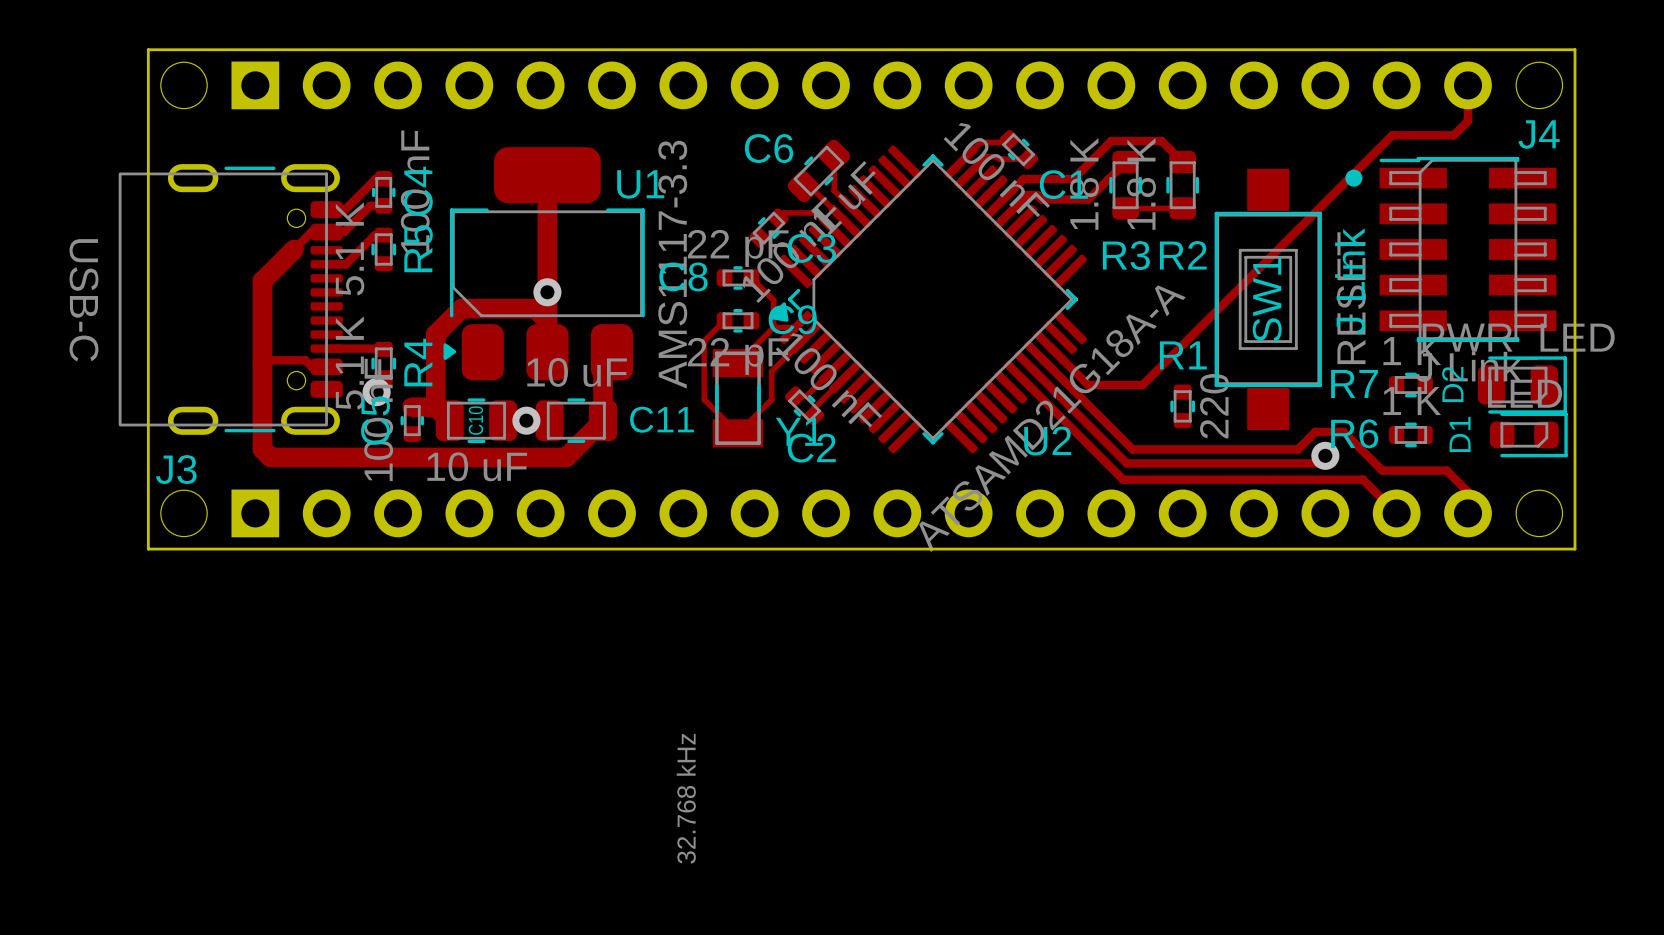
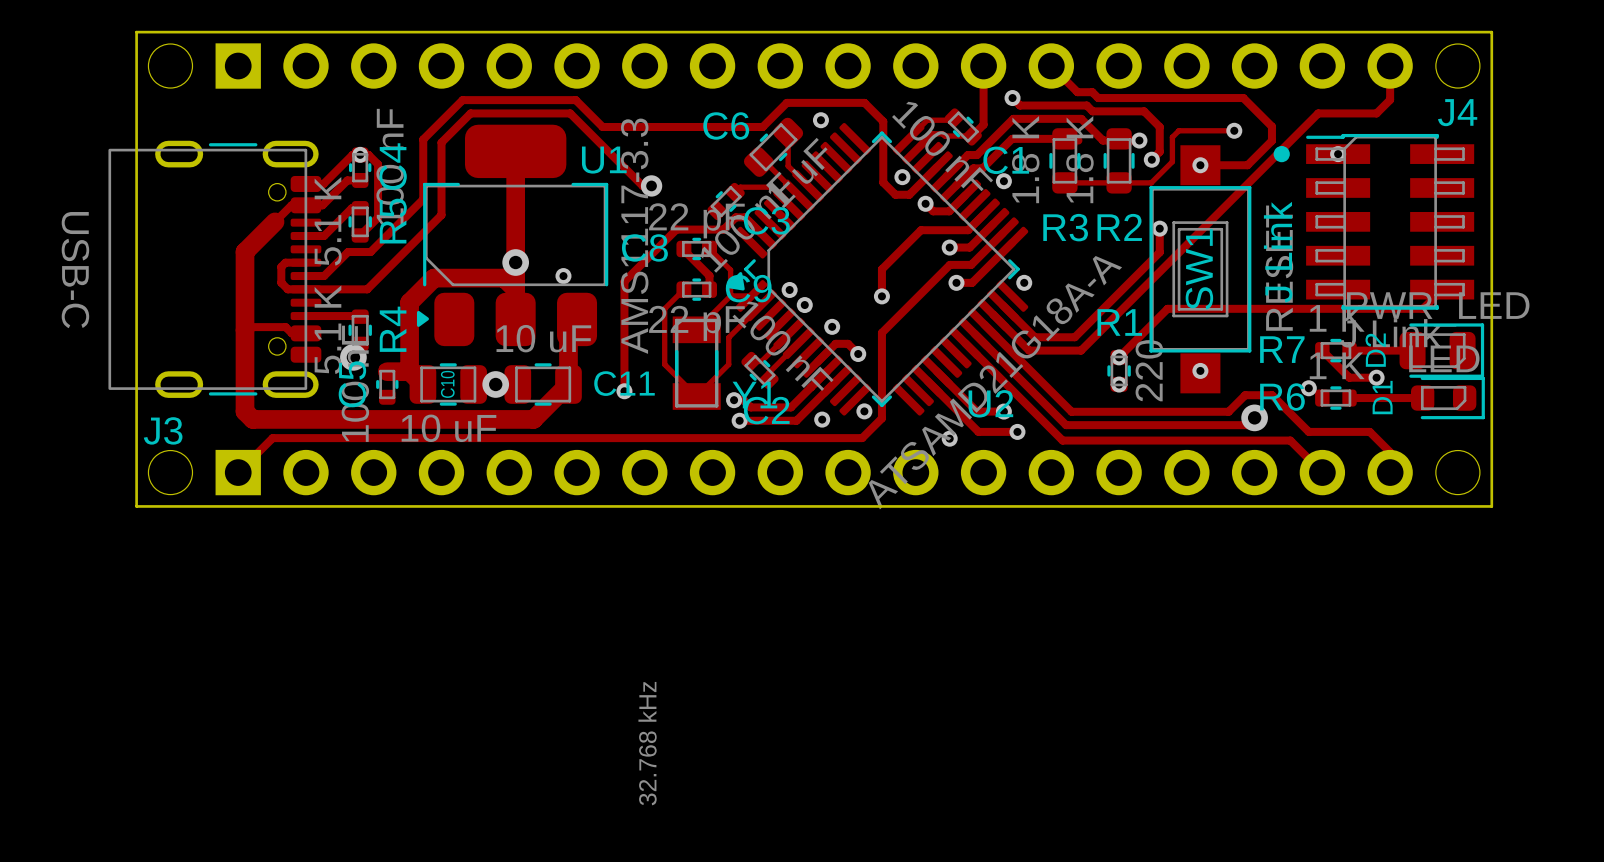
track: none -> (983, 66) (983, 124) (972, 136)
track: none -> (1051, 66) (1077, 92) (1092, 92) (1098, 98) (1243, 98) (1271, 126) (1271, 140) (1247, 165) (1200, 165)
track: none -> (1012, 98) (1020, 105) (1086, 105) (1092, 111) (1144, 111) (1159, 127) (1159, 151) (1151, 159)
via: none -> (1012, 98)
track: (1111, 141) (1073, 179) (1033, 179) -> (1051, 118) (1013, 118) (977, 155)
track: (1142, 141) (1161, 141) (1182, 162) -> (1081, 118) (1102, 140) (1139, 140)
via: none -> (820, 120)
track: none -> (1234, 130) (1178, 130) (1172, 137) (1172, 161) (1151, 182) (1119, 182)
via: none -> (1234, 130)
track: (1125, 162) (1088, 199) (1041, 199) (1037, 195) (1027, 195) -> (1078, 140) (1076, 138) (1012, 138) (982, 168) (971, 170)
via: none -> (1139, 140)
track: none -> (360, 154) (368, 154) (378, 164) (378, 217) (360, 235)
via: none -> (360, 154)
via: none -> (1338, 154)
via: none -> (1151, 159)
via: none -> (1200, 165)
track: none -> (936, 167) (909, 194) (895, 194) (883, 182) (883, 121) (864, 102) (786, 102) (762, 127) (602, 127) (575, 100) (462, 100) (423, 139) (423, 199) (370, 252) (348, 252) (324, 276) (305, 276)
via: none -> (902, 177)
via: none -> (1003, 181)
track: none -> (651, 185) (642, 185) (570, 113) (470, 113) (441, 142) (441, 215) (367, 289) (287, 289) (281, 282) (281, 266) (285, 262) (305, 262)
via: none -> (651, 185)
track: none -> (965, 195) (949, 211) (933, 211) (925, 203)
via: none -> (925, 203)
track: none -> (984, 214) (968, 230) (921, 230) (881, 269) (881, 296)
track: none -> (993, 223) (969, 247) (949, 247)
track: none -> (1159, 228) (1159, 252) (1074, 337) (1034, 337) (1002, 305)
via: none -> (1159, 228)
track: none -> (760, 233) (745, 217) (735, 217) (723, 229) (676, 229) (624, 281) (624, 391)
track: none -> (1002, 233) (971, 264) (949, 264) (881, 332) (881, 418) (862, 438) (272, 438) (238, 472)
track: none -> (1012, 242) (972, 282) (956, 282)
via: none -> (949, 247)
track: none -> (683, 248) (709, 275) (709, 289)
via: none -> (563, 276)
via: none -> (956, 282)
via: none -> (1024, 282)
track: none -> (1442, 289) (1422, 308) (1167, 308) (1119, 357)
via: none -> (789, 289)
via: none -> (881, 296)
via: none -> (804, 305)
via: none -> (832, 326)
track: none -> (1322, 350) (1349, 377) (1376, 377)
track: none -> (1349, 350) (1412, 350)
track: none -> (858, 353) (848, 343) (835, 343) (817, 361)
via: none -> (858, 353)
via: none -> (1119, 357)
track: none -> (827, 371) (790, 407) (750, 407) (743, 400) (734, 400)
track: none -> (936, 371) (977, 411) (1003, 411)
via: none -> (1200, 370)
via: none -> (1376, 377)
track: none -> (836, 380) (796, 420) (739, 420)
track: none -> (927, 380) (978, 431) (1017, 431)
via: none -> (1119, 384)
via: none -> (1308, 388)
via: none -> (624, 391)
track: none -> (1349, 398) (1422, 398)
via: none -> (734, 400)
via: none -> (864, 411)
via: none -> (1003, 411)
via: none -> (822, 419)
via: none -> (739, 420)
via: none -> (1017, 431)
via: none -> (949, 438)

